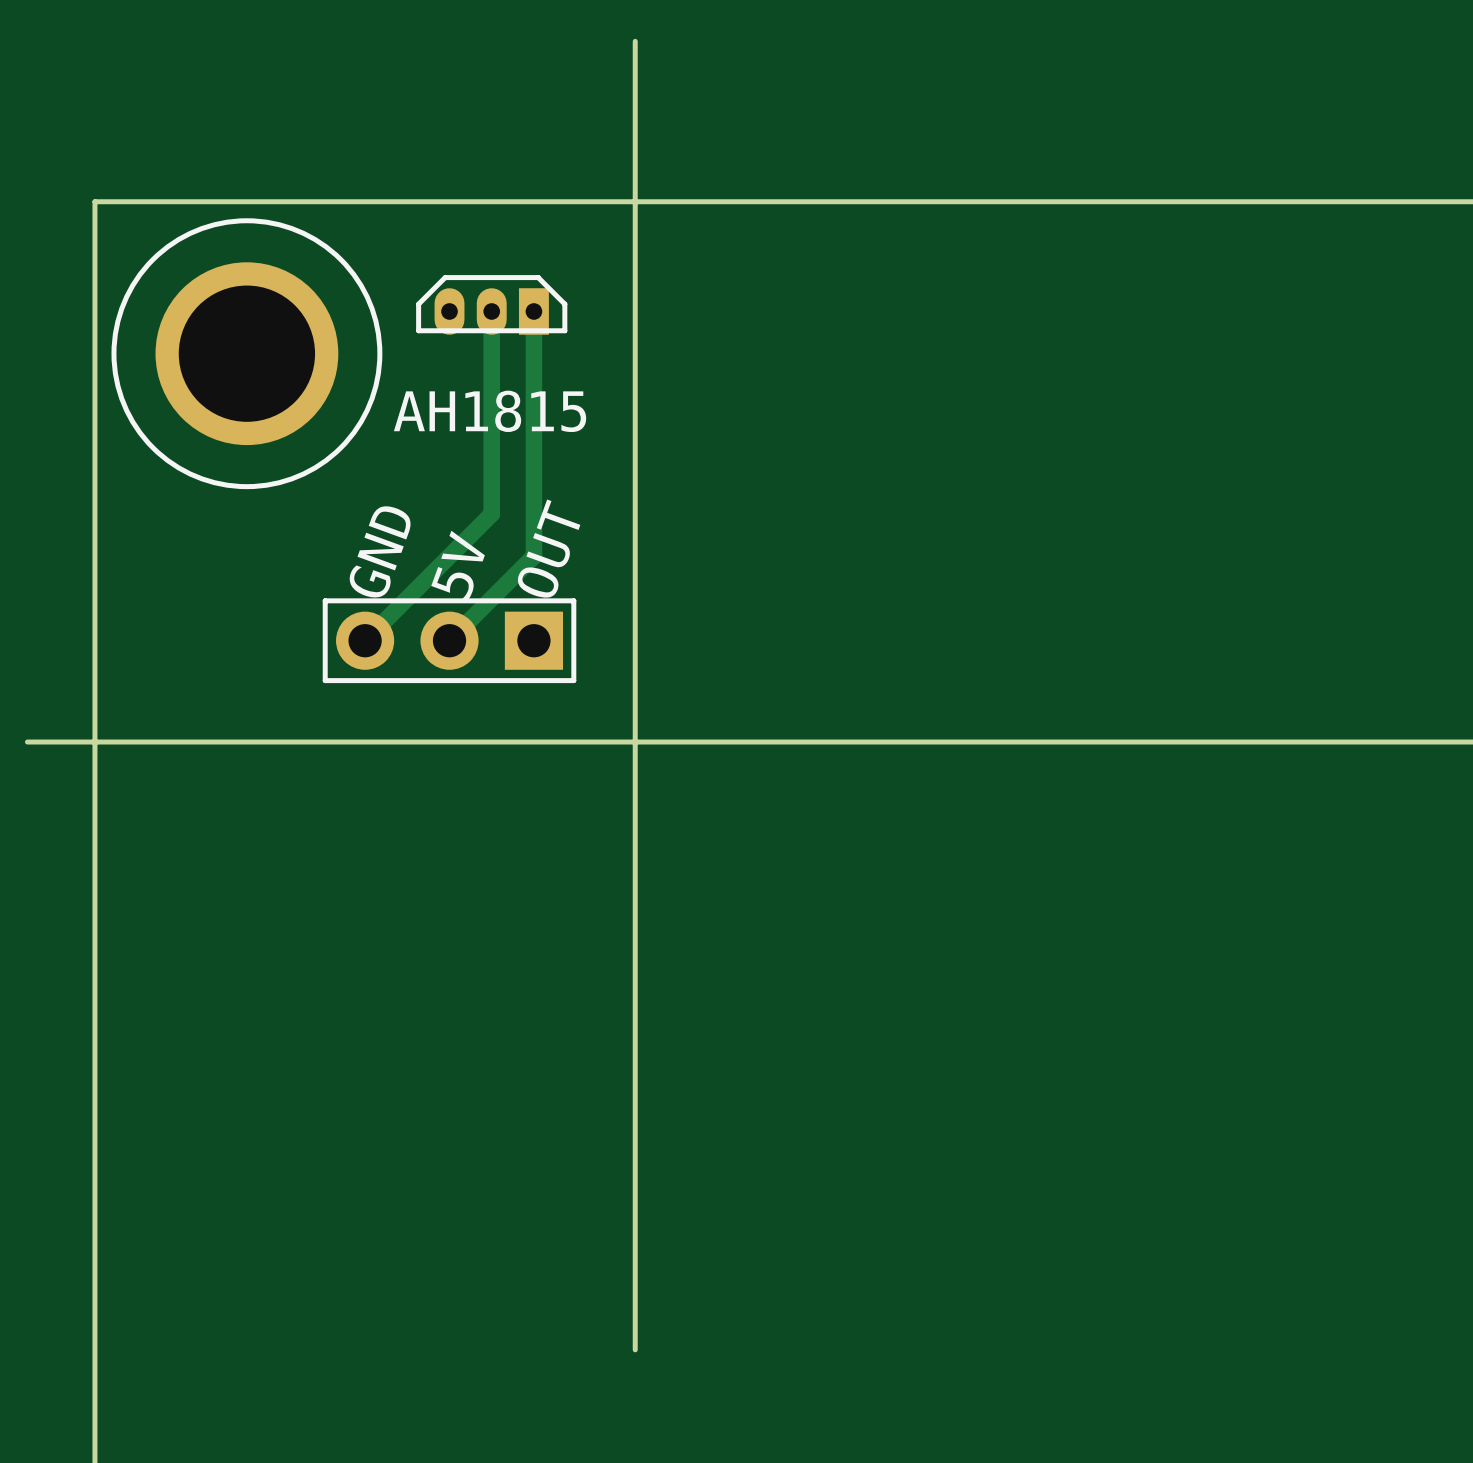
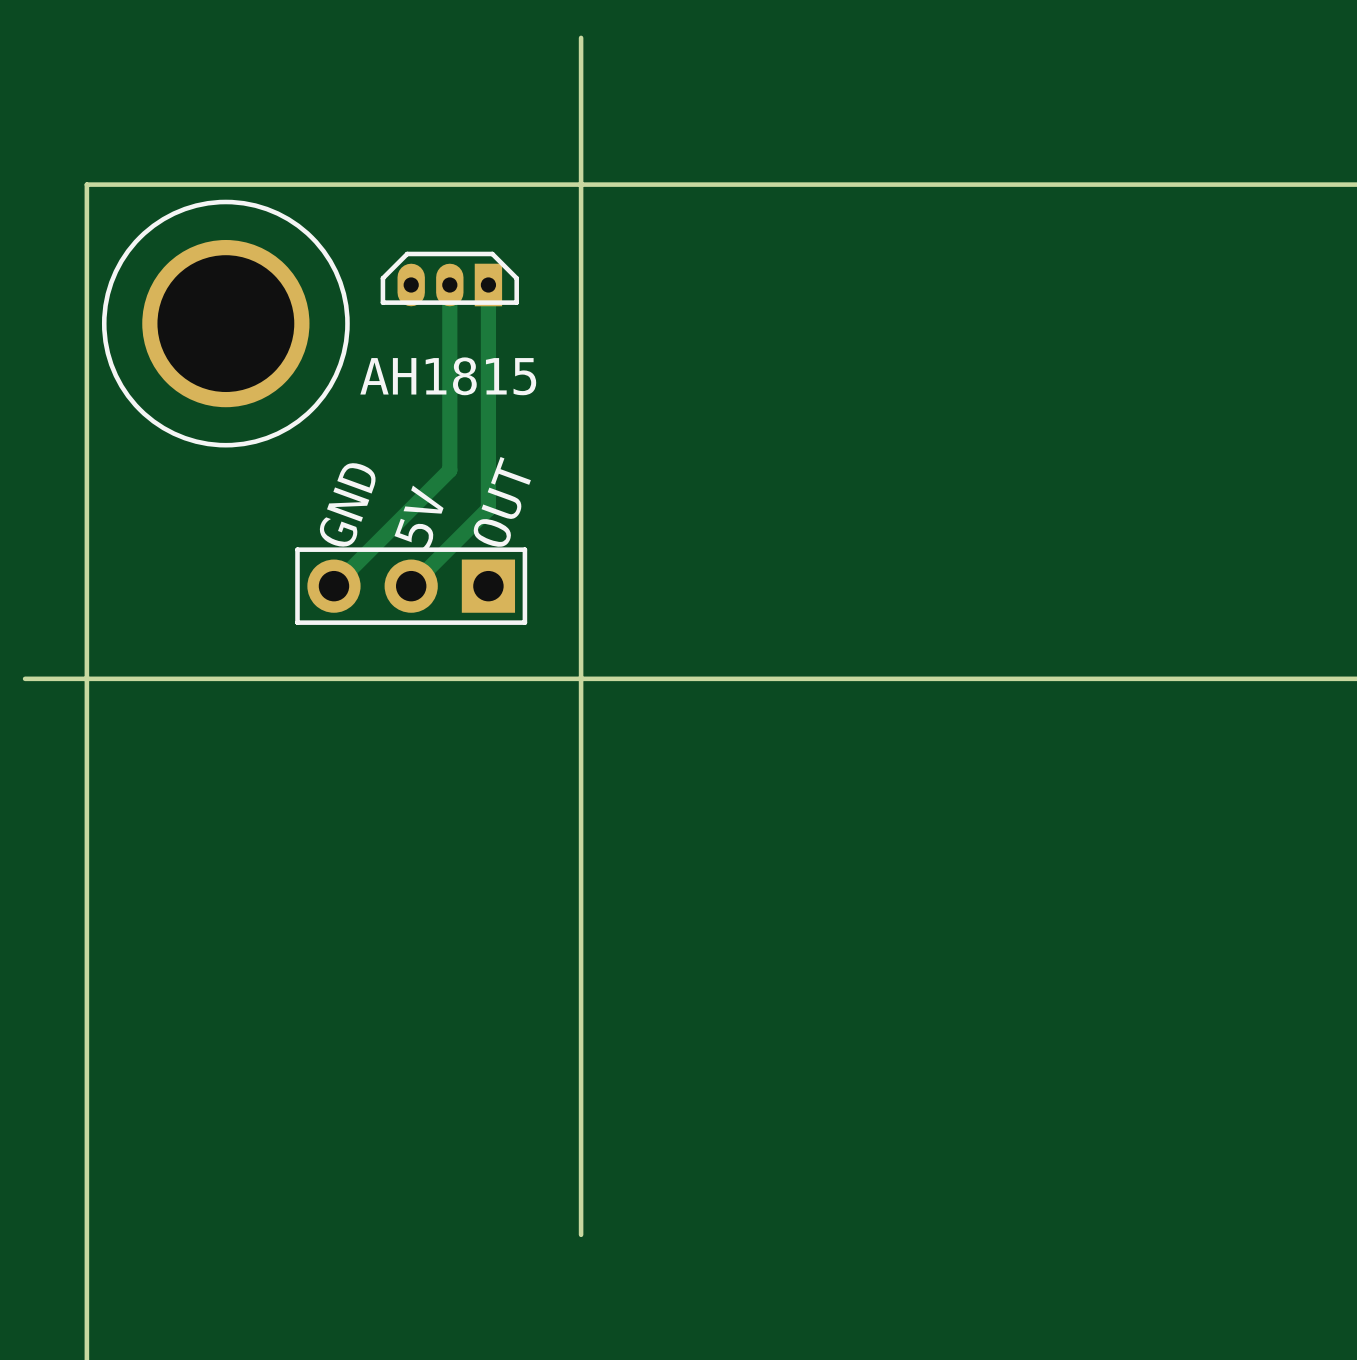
part footprint: [111, 218, 383, 490] -> [101, 199, 350, 448]

